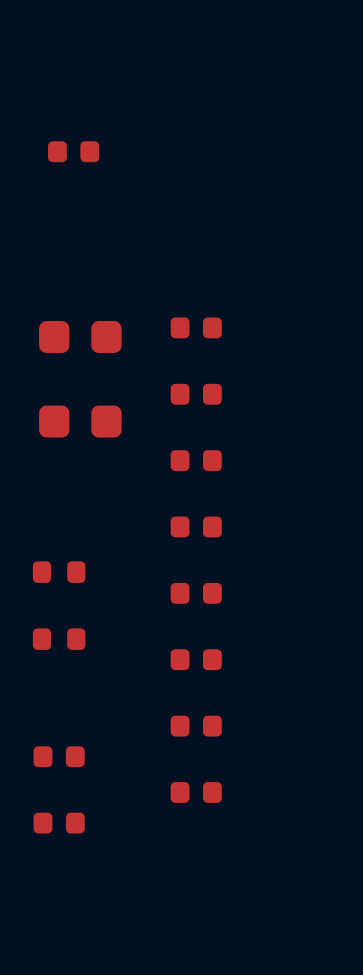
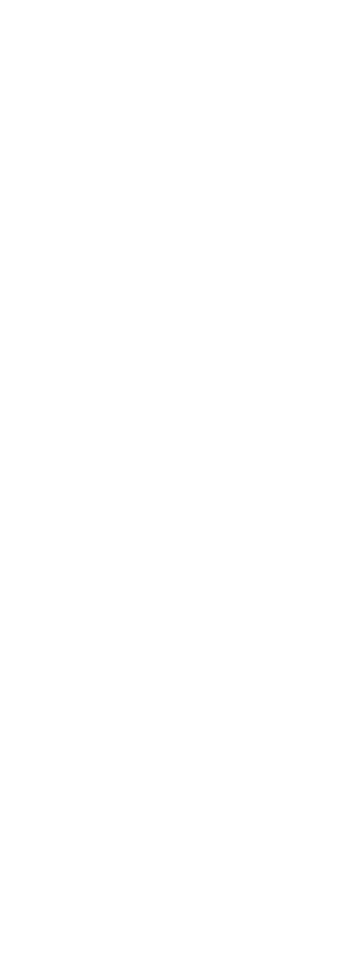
part: (73, 151) -> none
part: (196, 327) -> none
part: (80, 336) -> none
part: (196, 394) -> none
part: (80, 421) -> none
part: (196, 460) -> none
part: (196, 526) -> none
part: (59, 572) -> none
part: (196, 593) -> none
part: (59, 639) -> none
part: (196, 659) -> none
part: (196, 726) -> none
part: (59, 756) -> none
part: (196, 792) -> none
part: (59, 823) -> none

